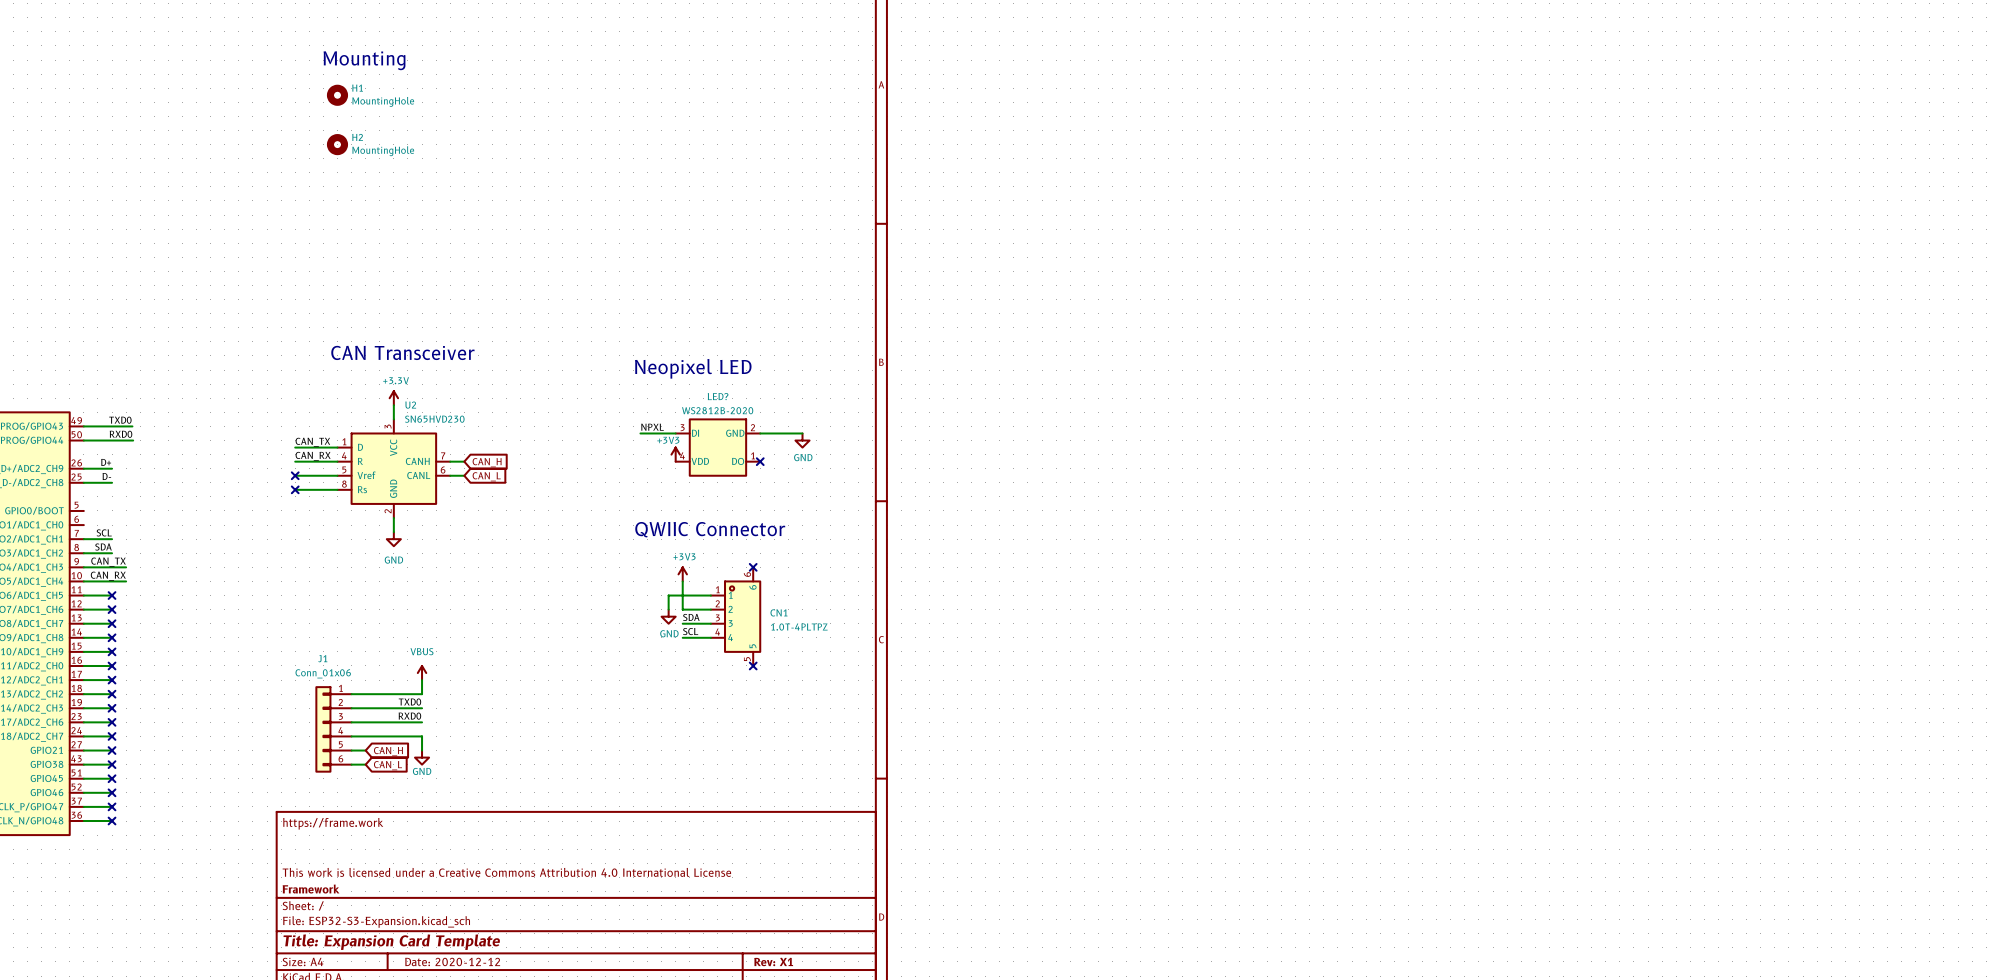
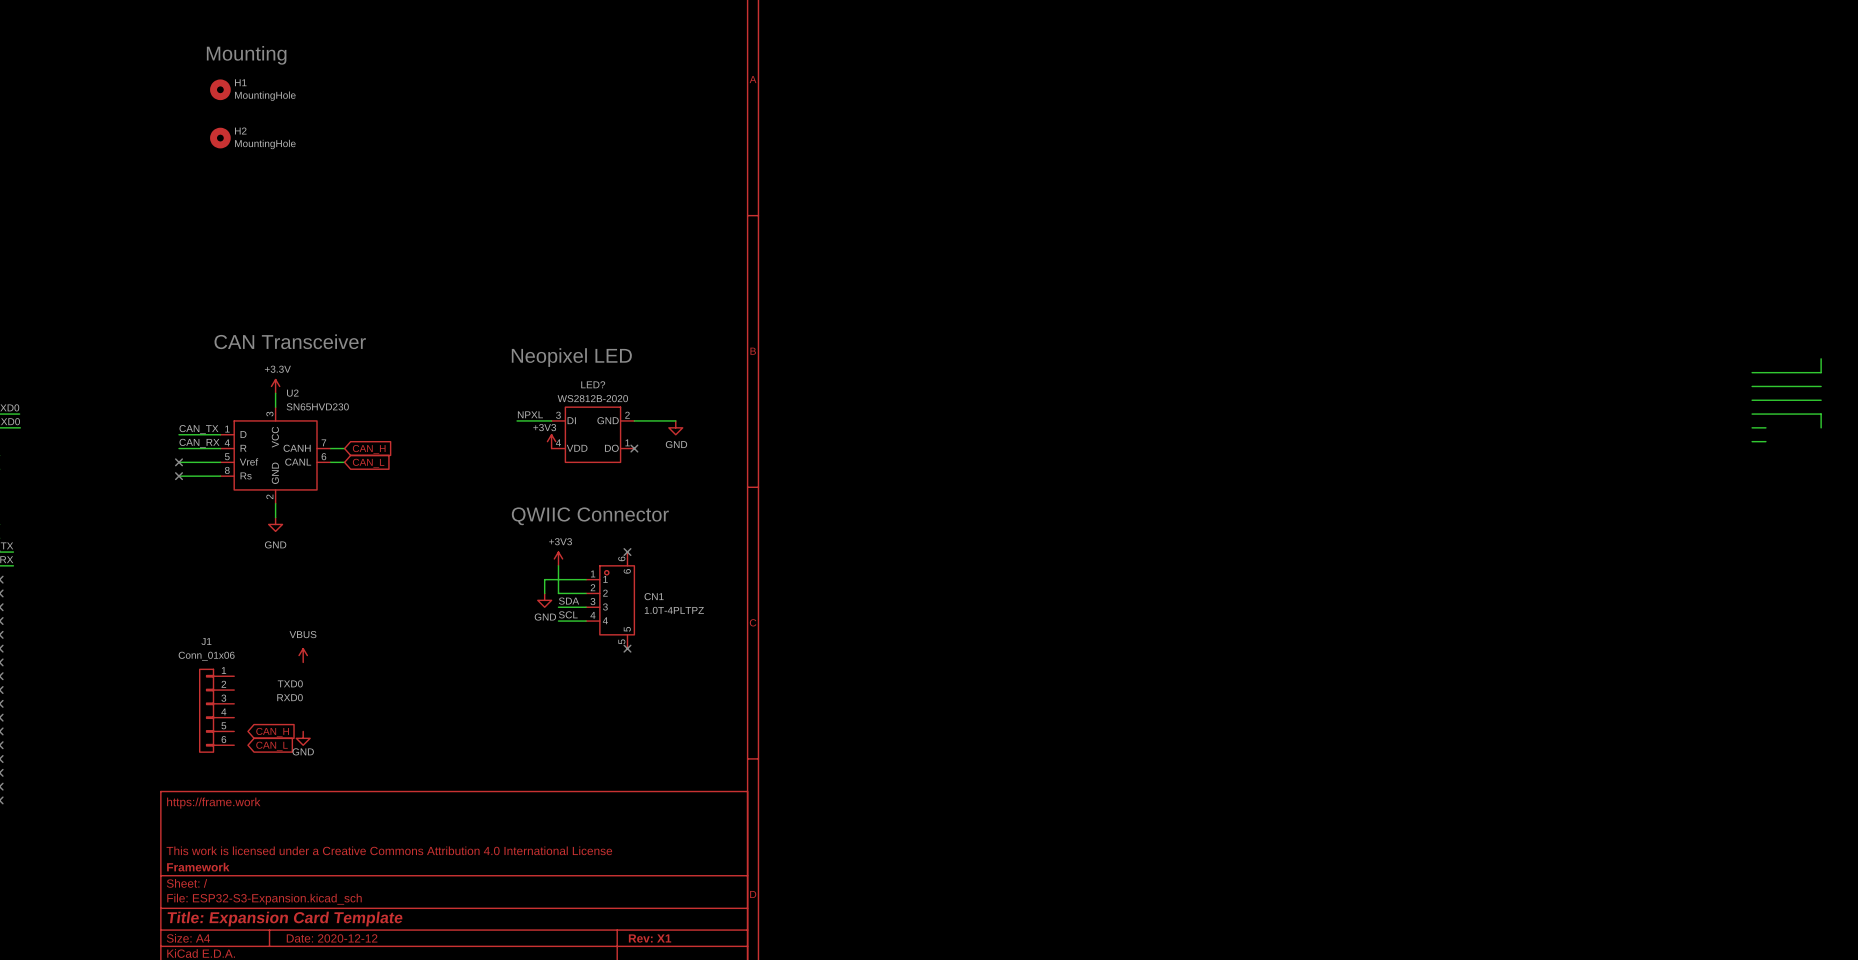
wire: none -> (1821, 358) (1821, 372) (1752, 372)
wire: none -> (1752, 386) (1821, 386)
wire: none -> (1752, 400) (1821, 400)
wire: none -> (1752, 414) (1821, 414) (1821, 427)
wire: none -> (1752, 427) (1765, 427)
wire: none -> (1752, 441) (1765, 441)
wire: (422, 680) (422, 694) (351, 694) -> none
wire: (351, 708) (422, 708) -> none
wire: (351, 722) (422, 722) -> none
wire: (351, 736) (422, 736) (422, 750) -> none
wire: (351, 750) (365, 750) -> none
wire: (351, 764) (365, 764) -> none

